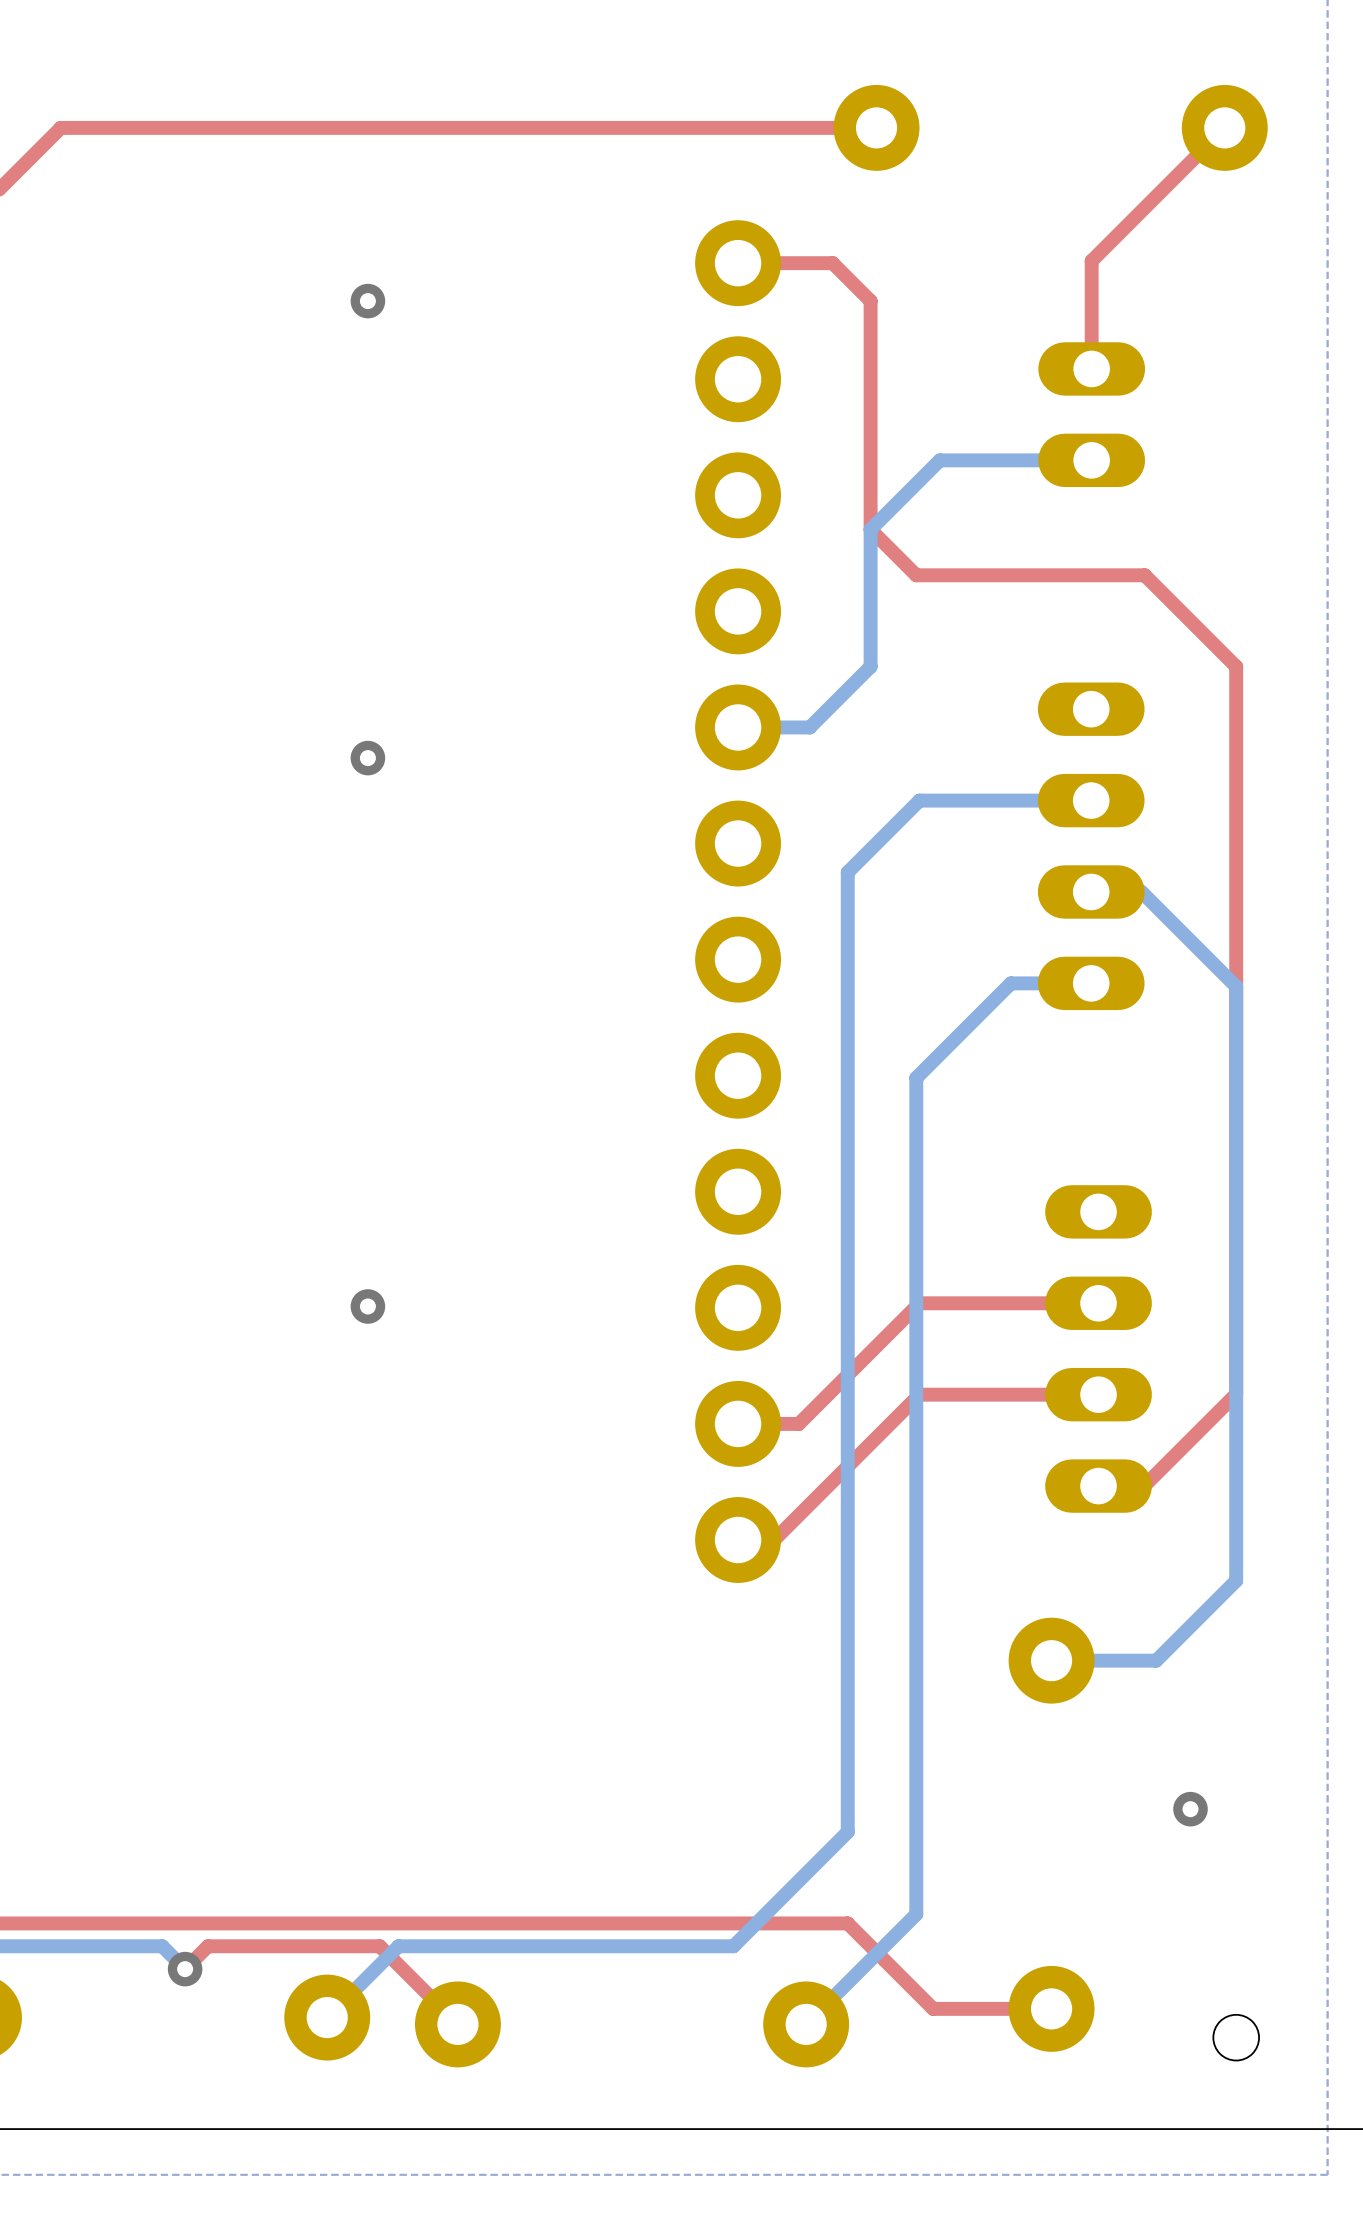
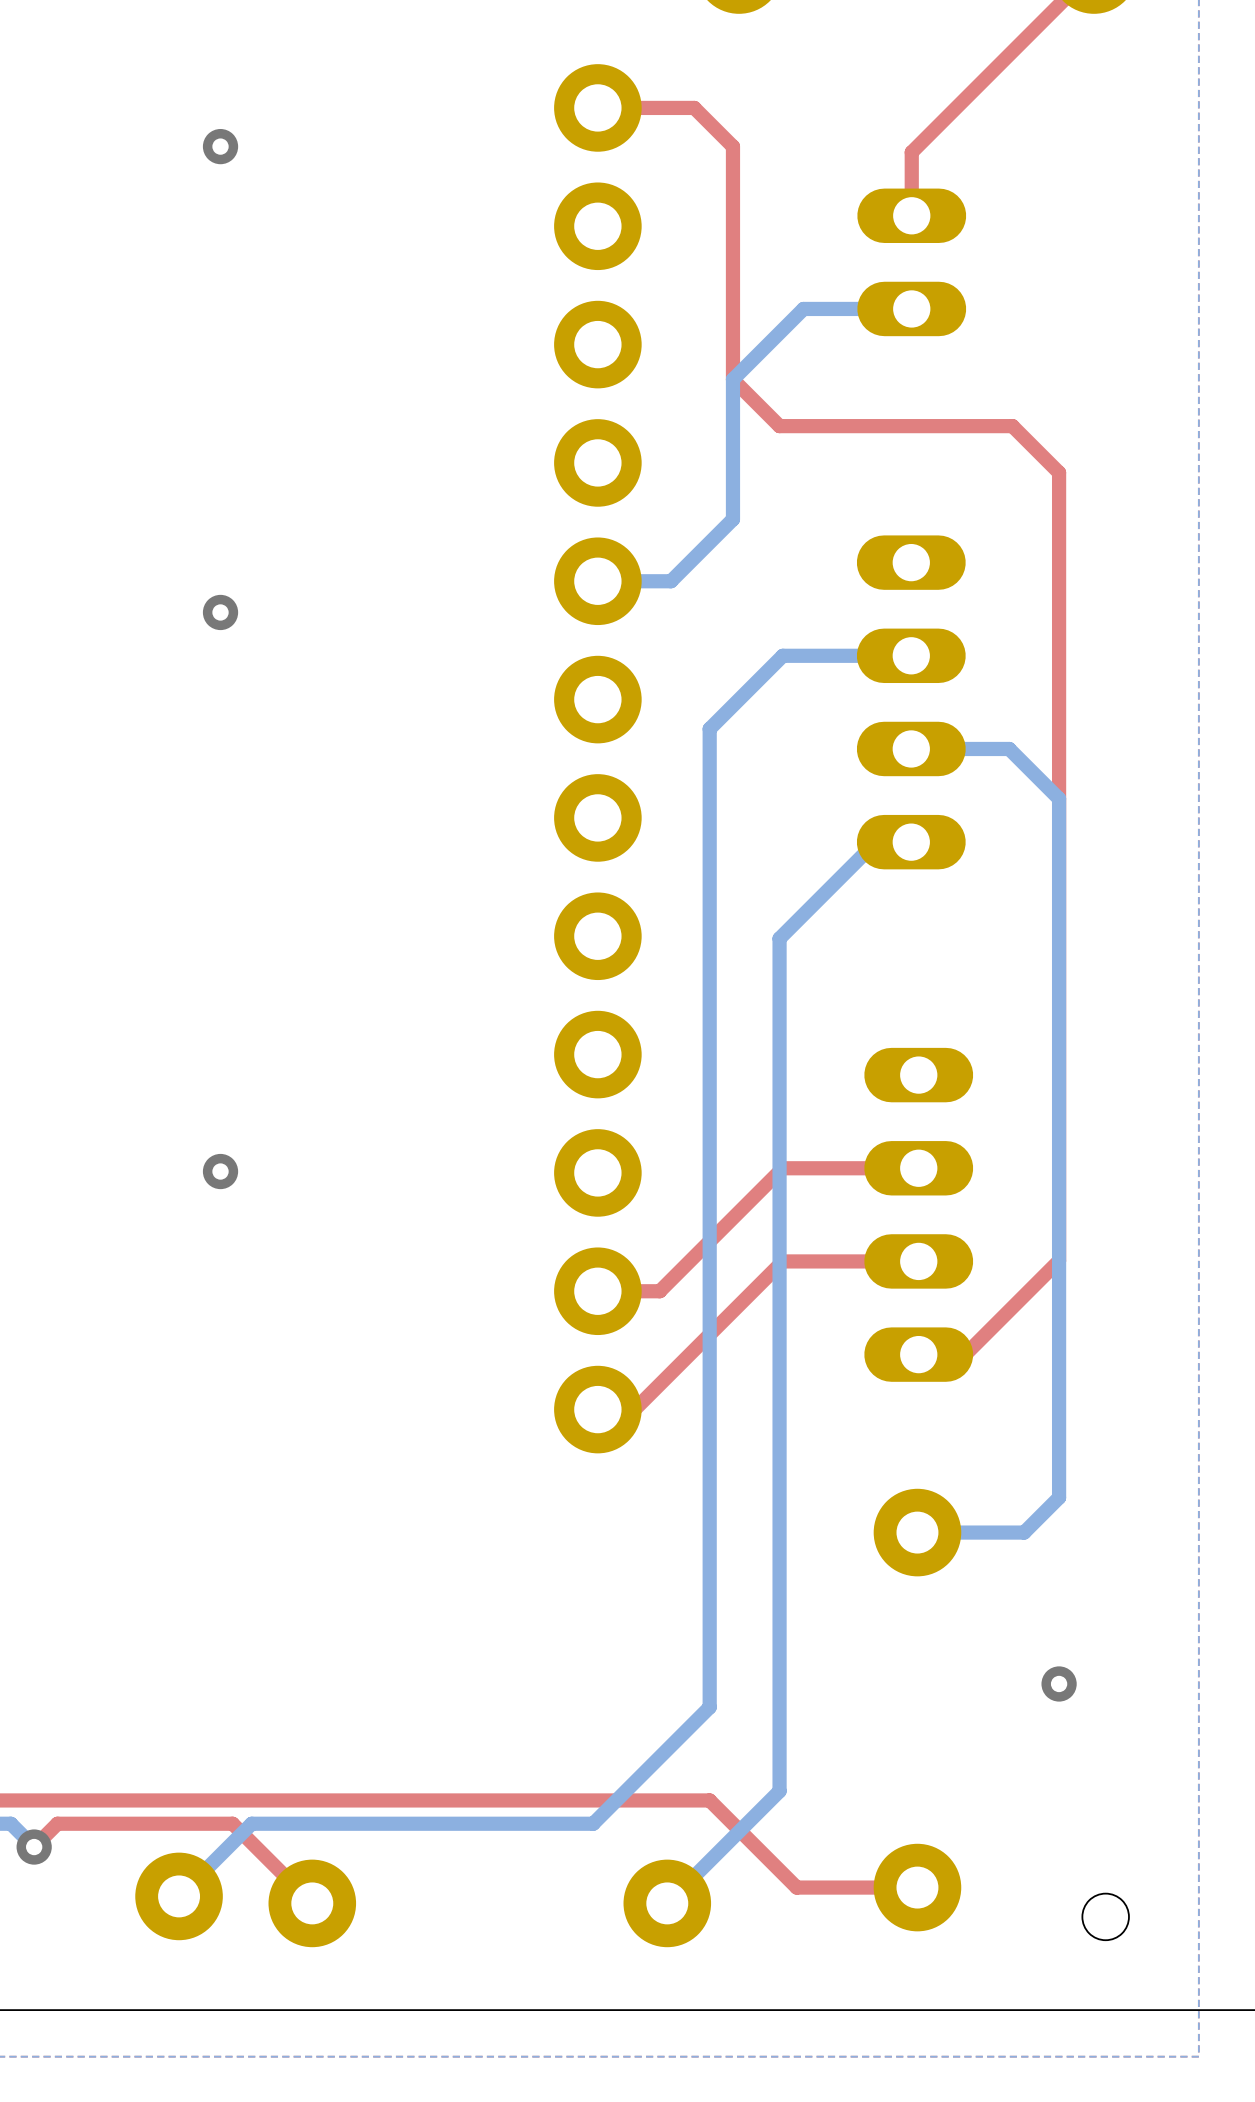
top track: (1091, 261) (1091, 368) -> (958, 105) (911, 152) (911, 215)
part position: (1091, 414) -> (911, 262)
top track: (1190, 620) (1236, 666) (1236, 1394) (1144, 1486) (1098, 1486) -> (1059, 472) (1059, 1260) (965, 1354) (918, 1354)
part position: (1091, 846) -> (911, 702)
bottom track: (1190, 940) (1236, 986) (1236, 1580) (1190, 1626) -> (1059, 798) (1059, 1497)
part position: (1098, 1348) -> (918, 1214)

